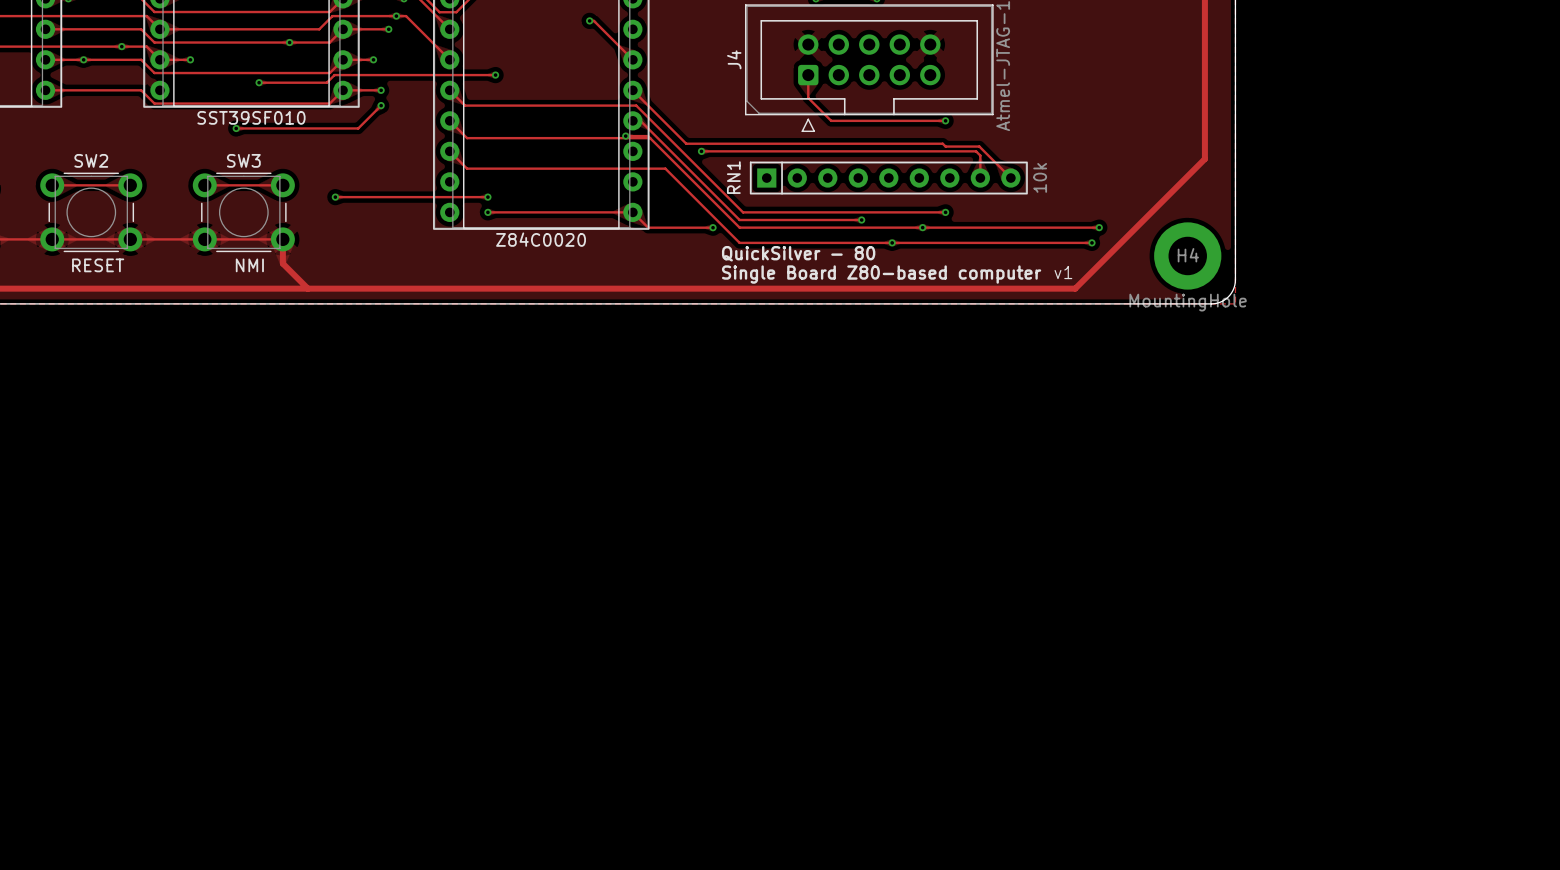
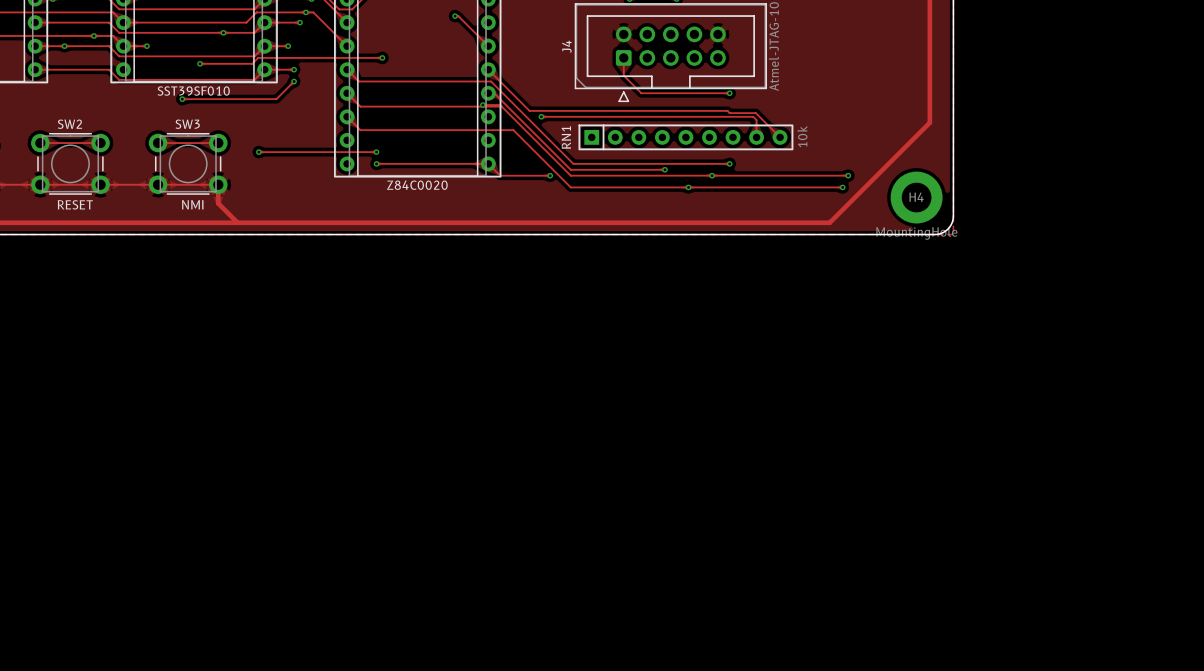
text: QuickSilver - 80 (798, 253) -> none
text: v1 (1063, 272) -> none
text: Single Board Z80-based computer (881, 274) -> none

